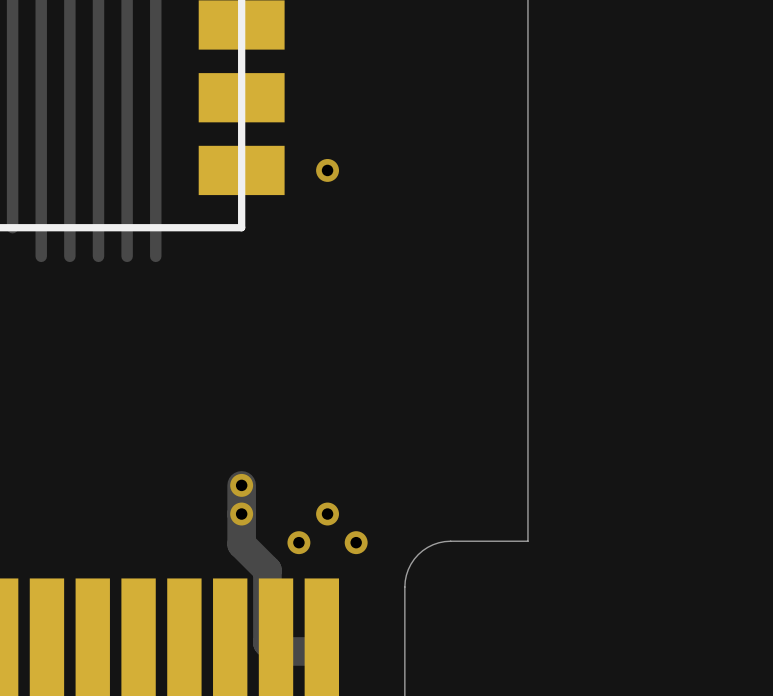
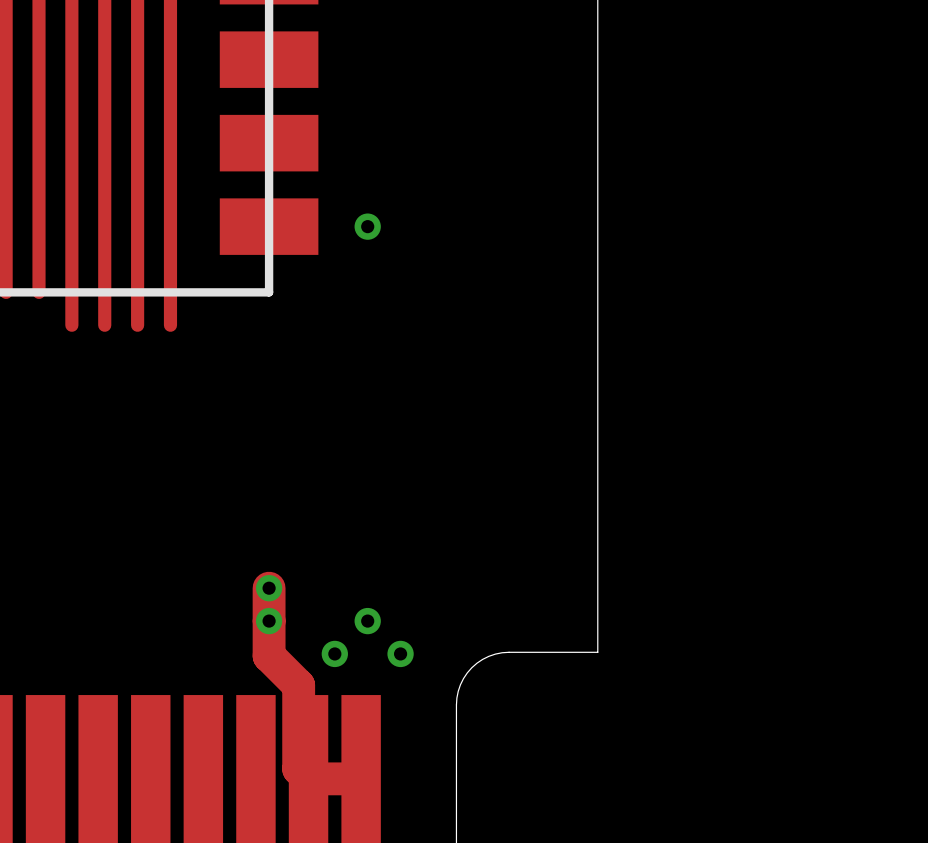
track: (41, 227) (41, 256) -> none

